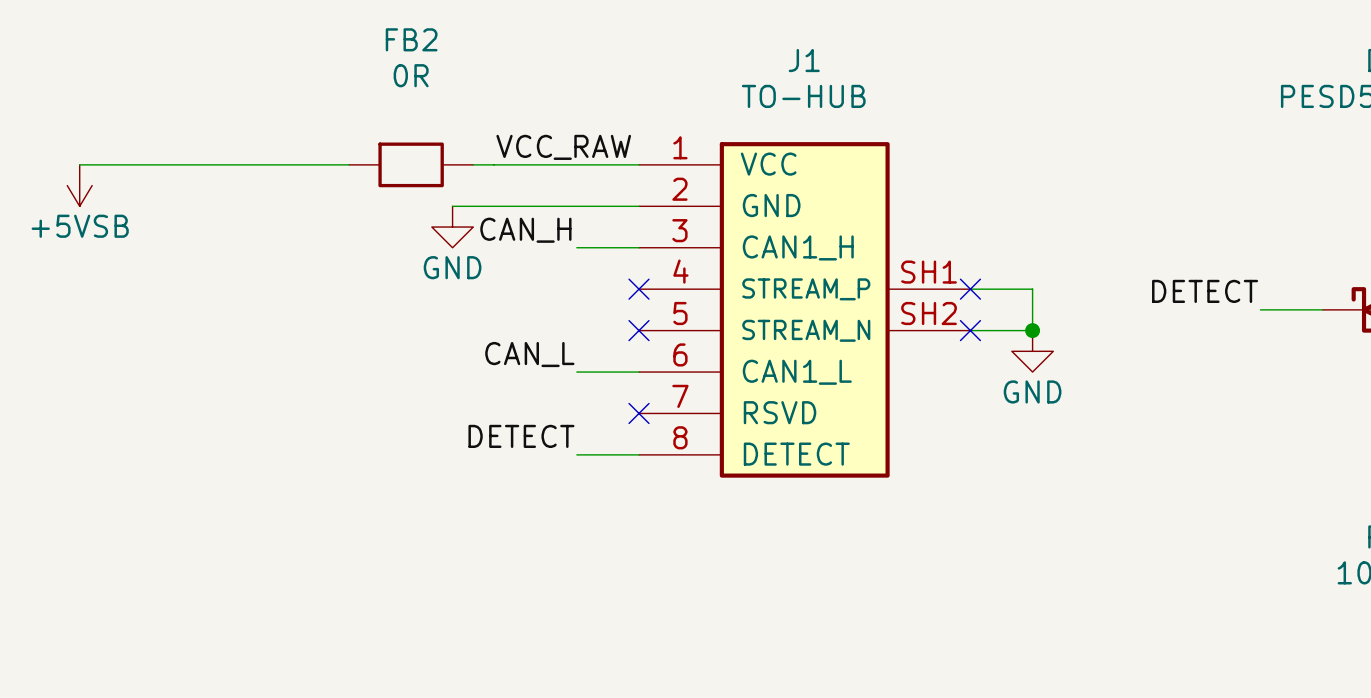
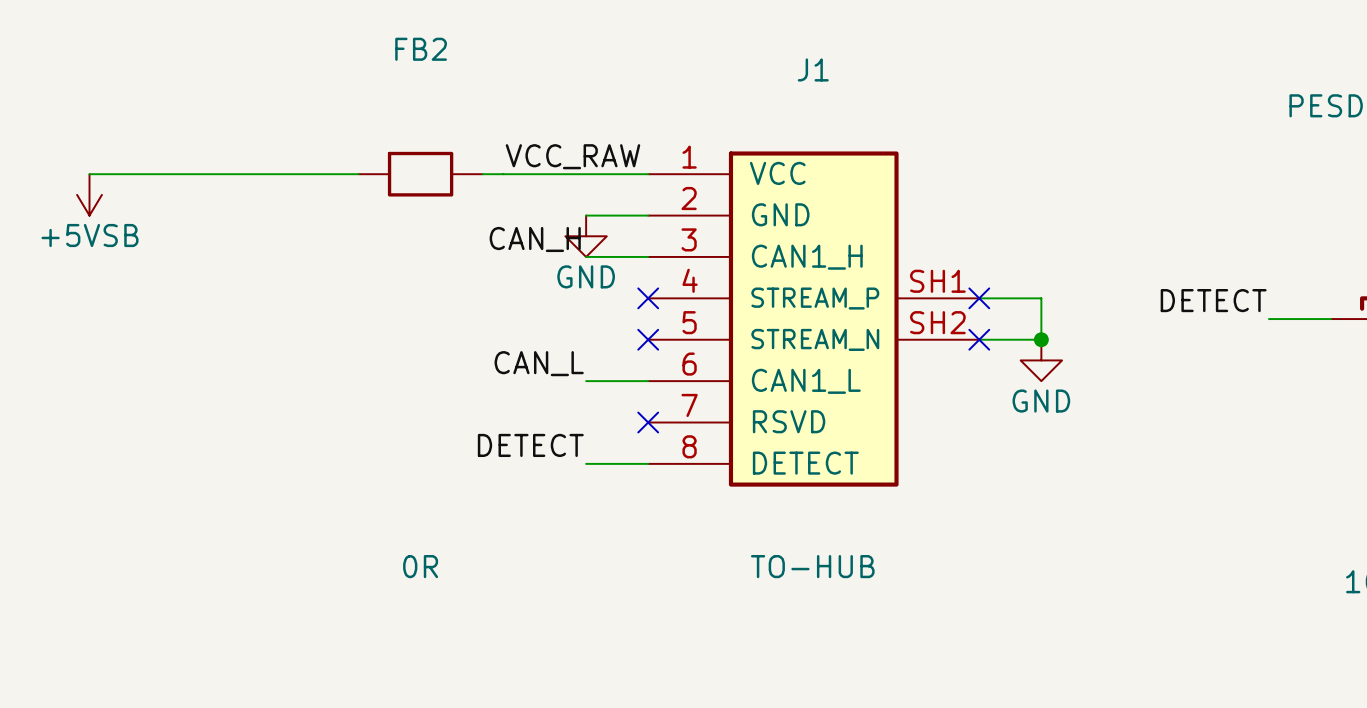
FB2 value position: 0R (411, 75) -> 0R (420, 566)
J1 value position: TO-HUB (803, 96) -> TO-HUB (812, 566)
wire: (452, 206) (576, 206) -> none
power symbol position: GND (452, 227) -> GND (586, 236)

